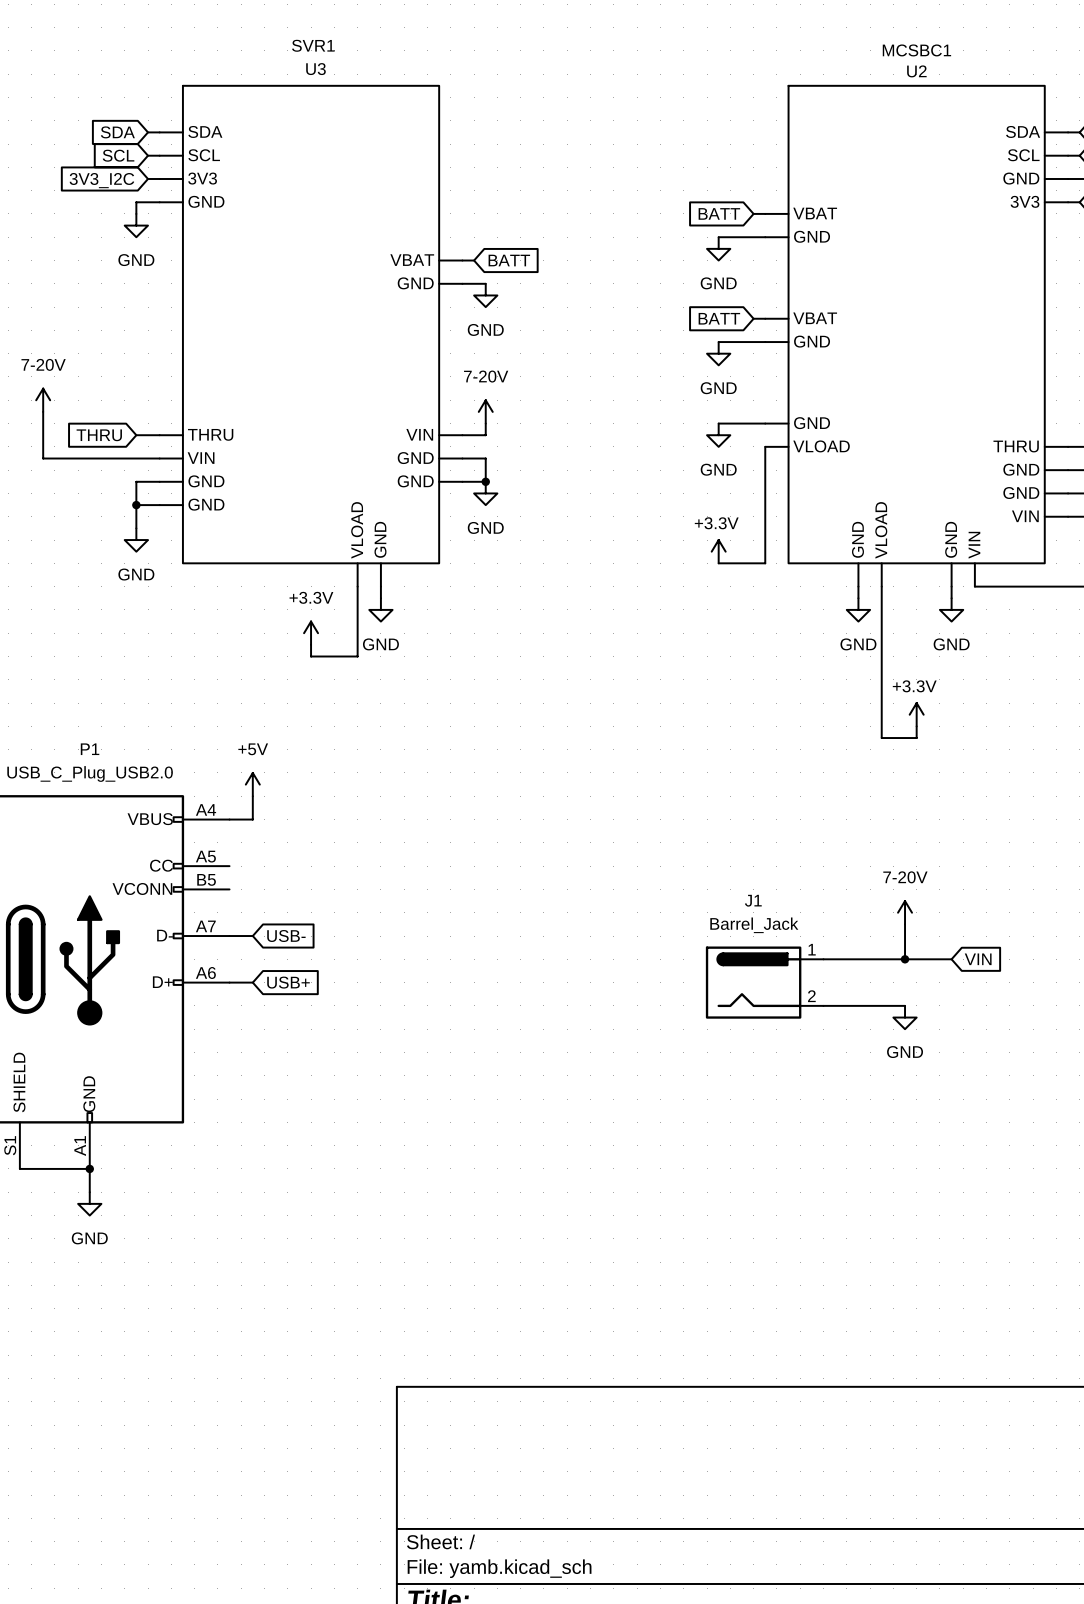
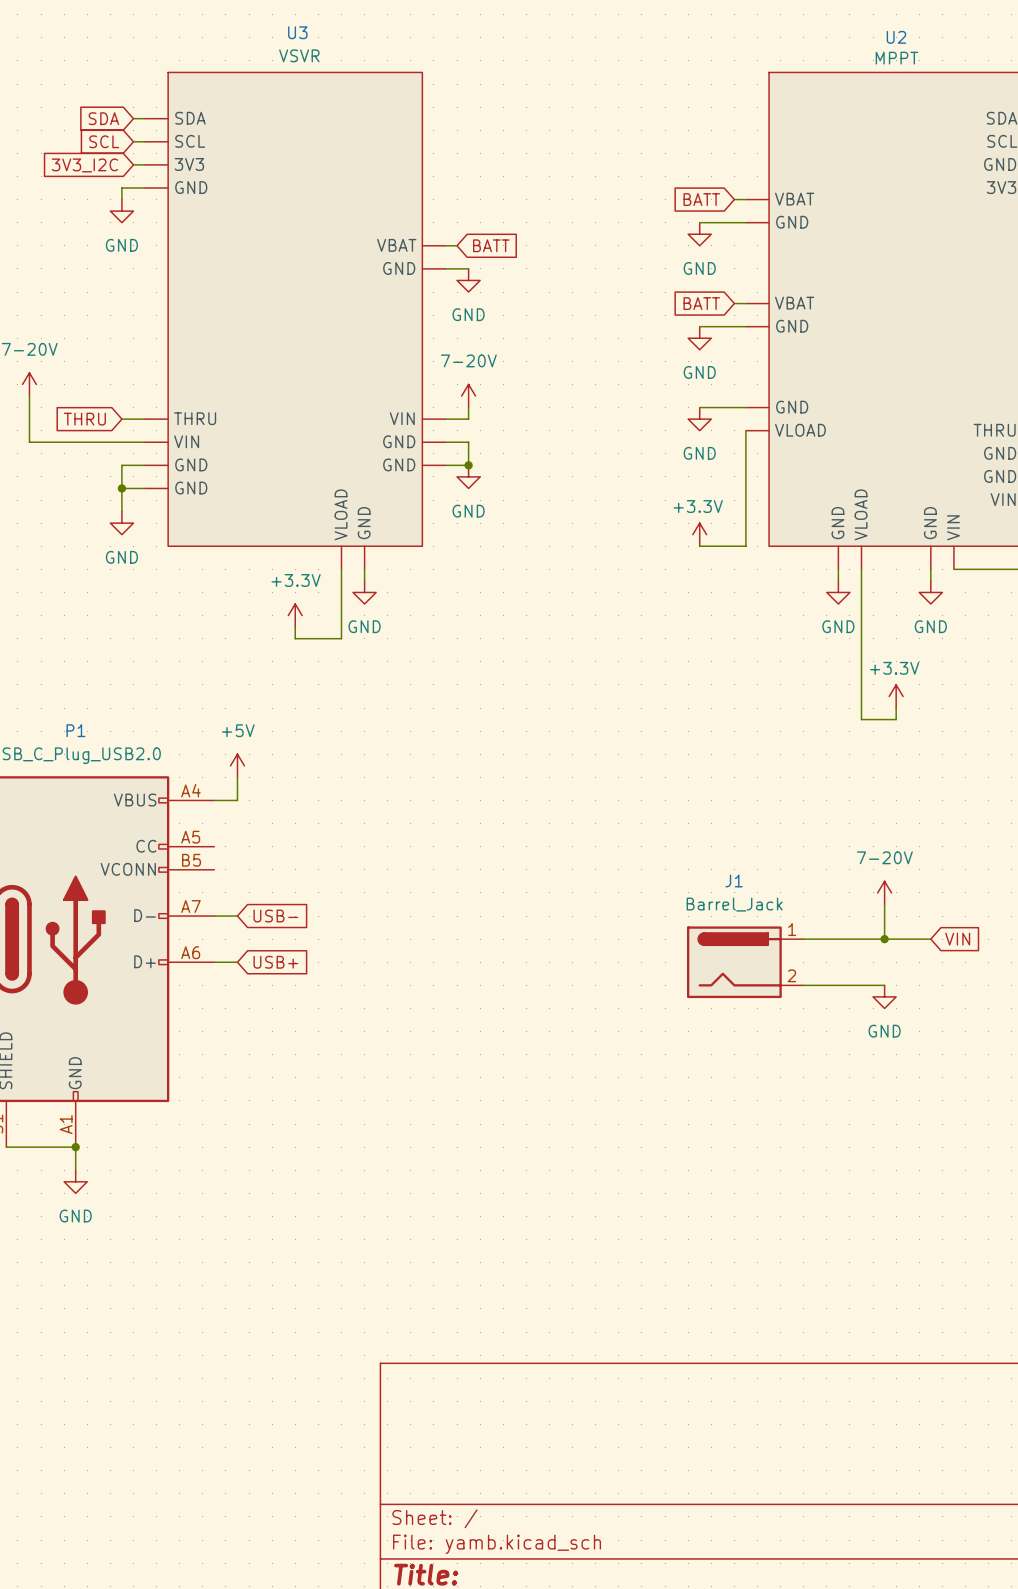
SVR1 name: SVR1 (313, 45) -> U3 (297, 32)
MCSBC1 name: MCSBC1 (916, 50) -> U2 (896, 37)
SVR1 value: U3 (315, 69) -> VSVR (299, 55)
MCSBC1 value: U2 (916, 71) -> MPPT (896, 58)

